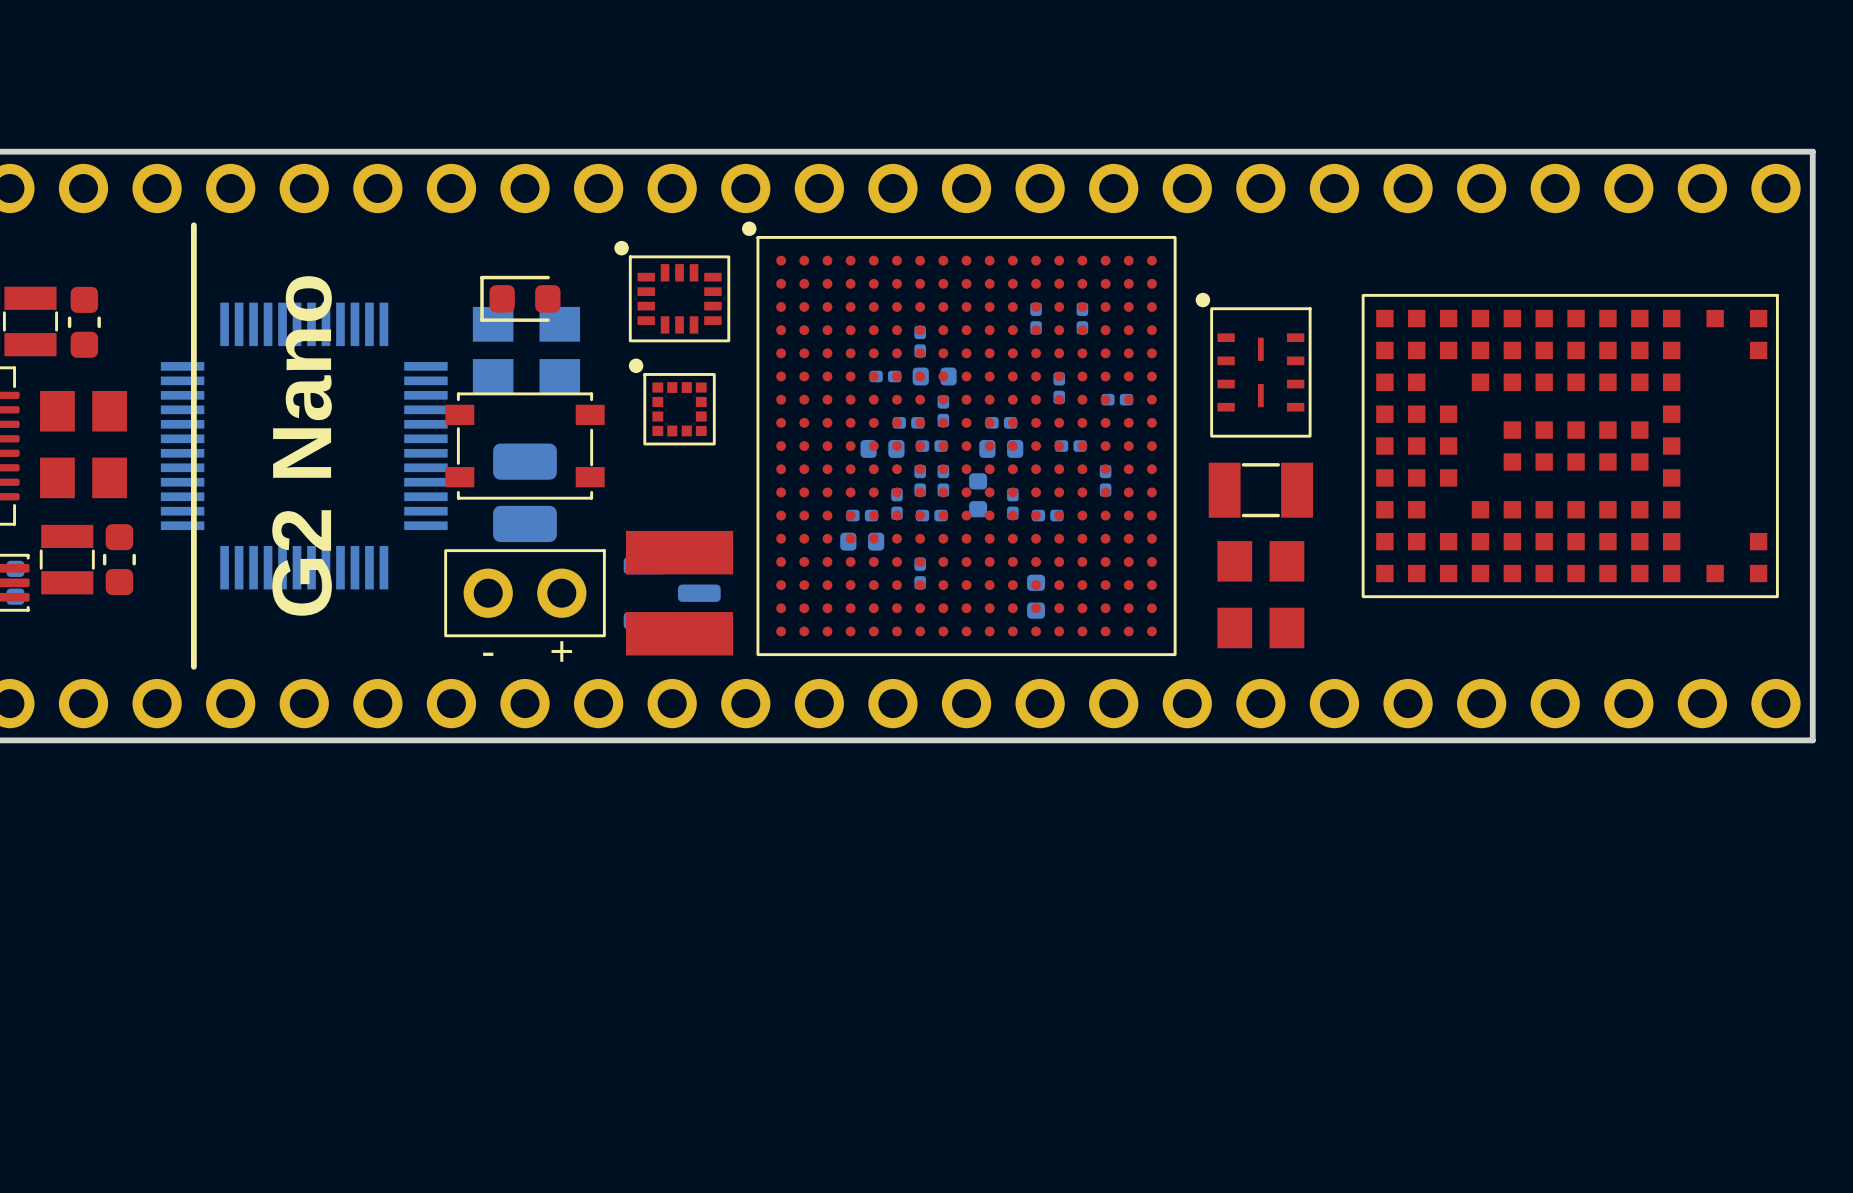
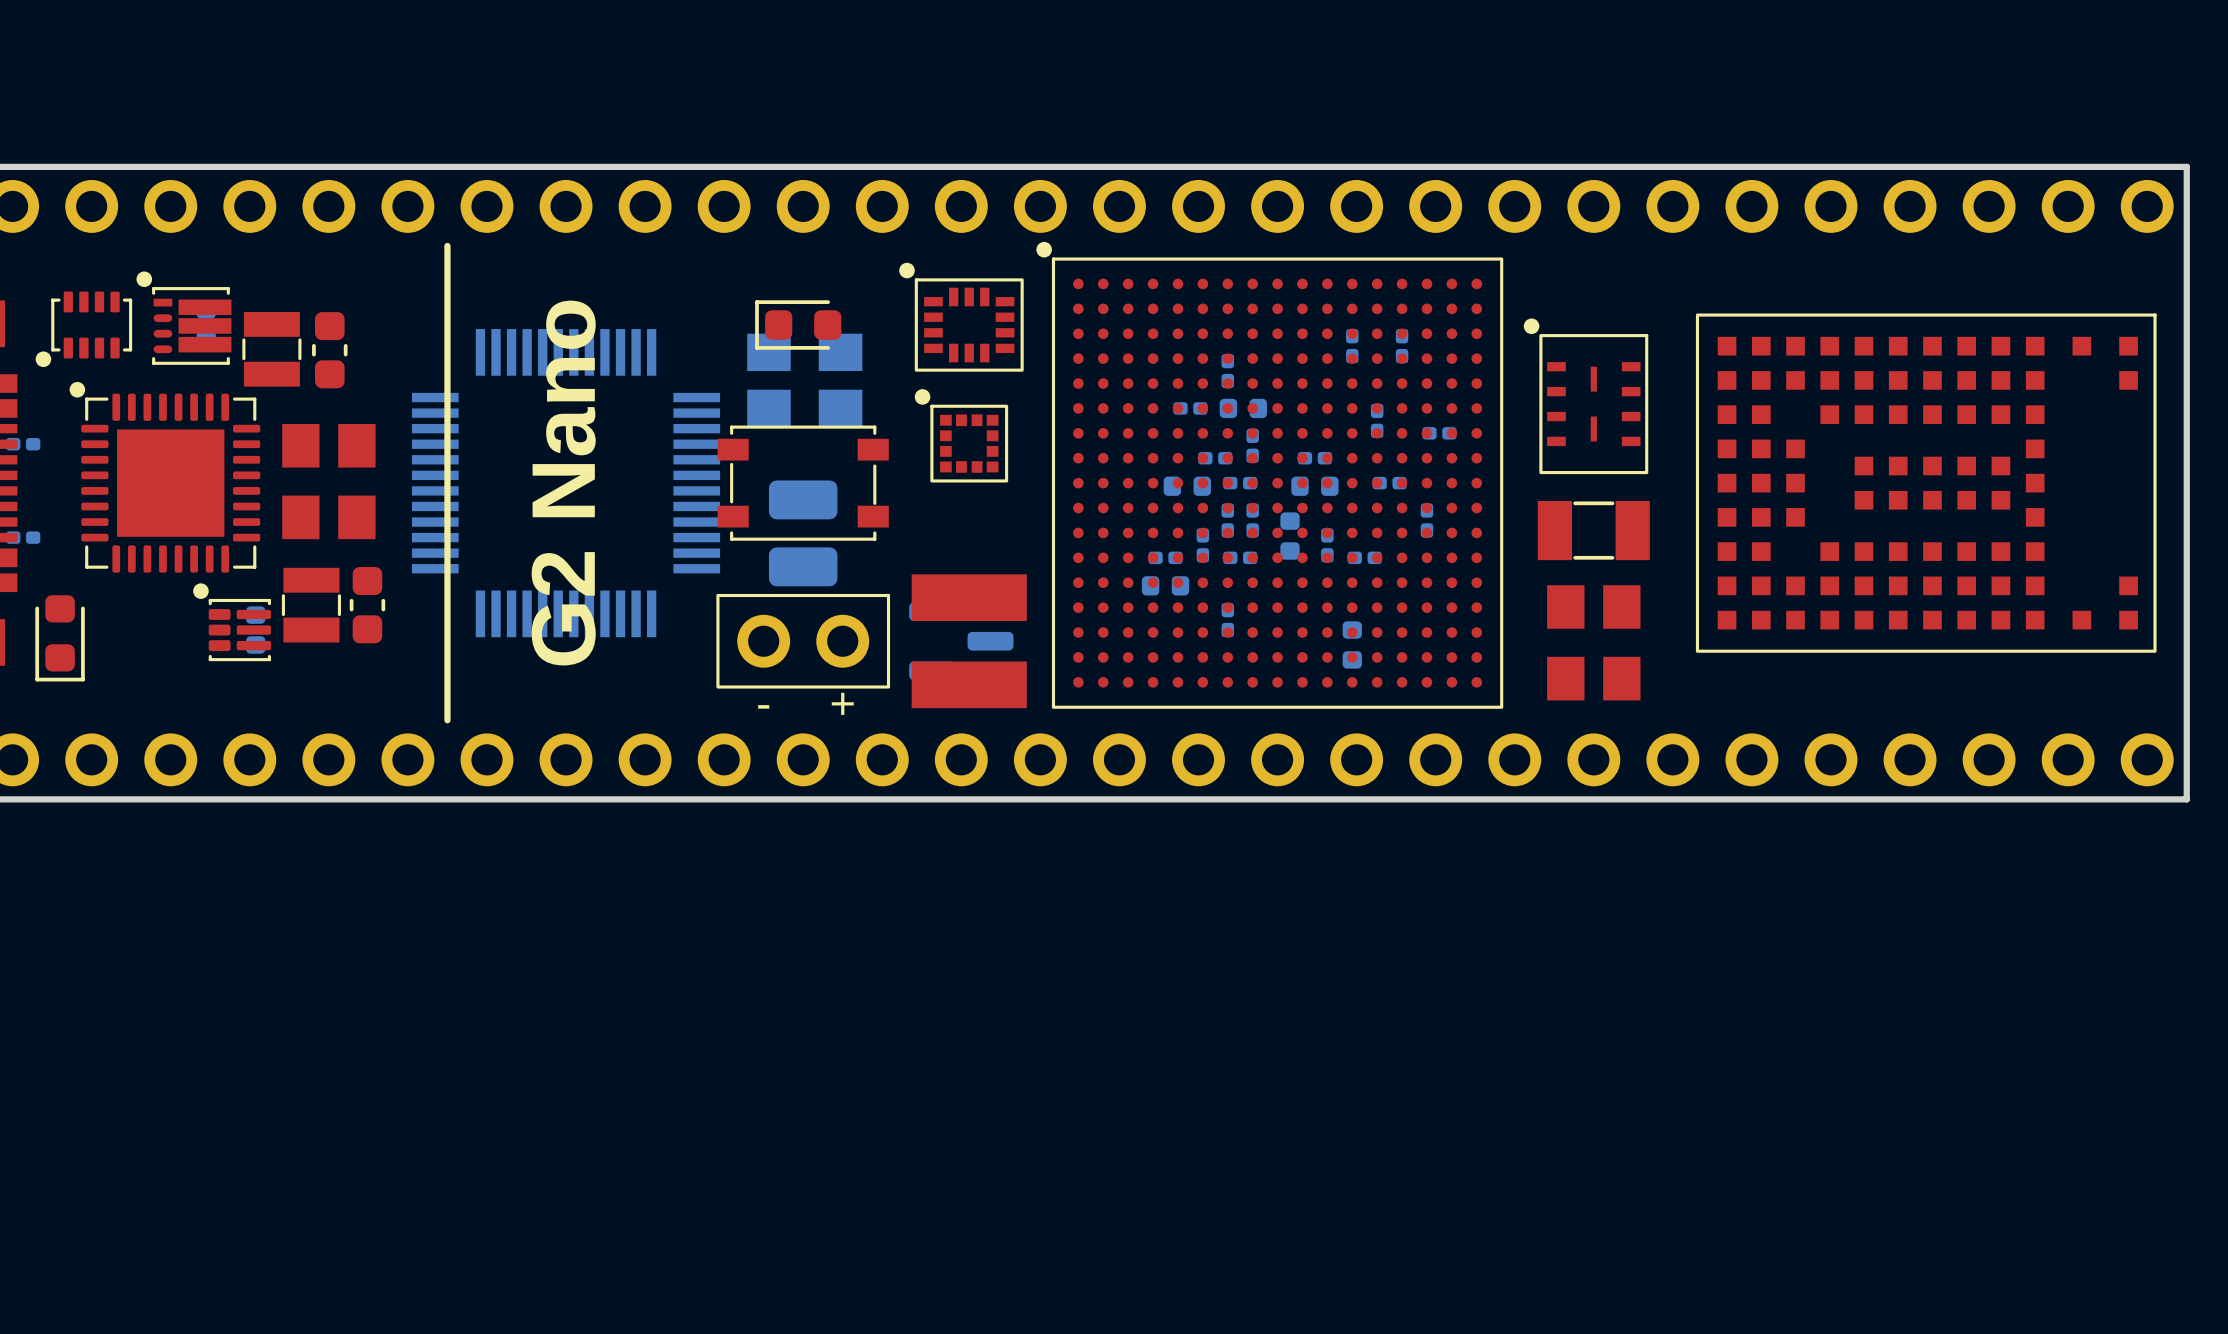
part footprint: [1361, 293, 1779, 599] -> [1695, 313, 2157, 653]

